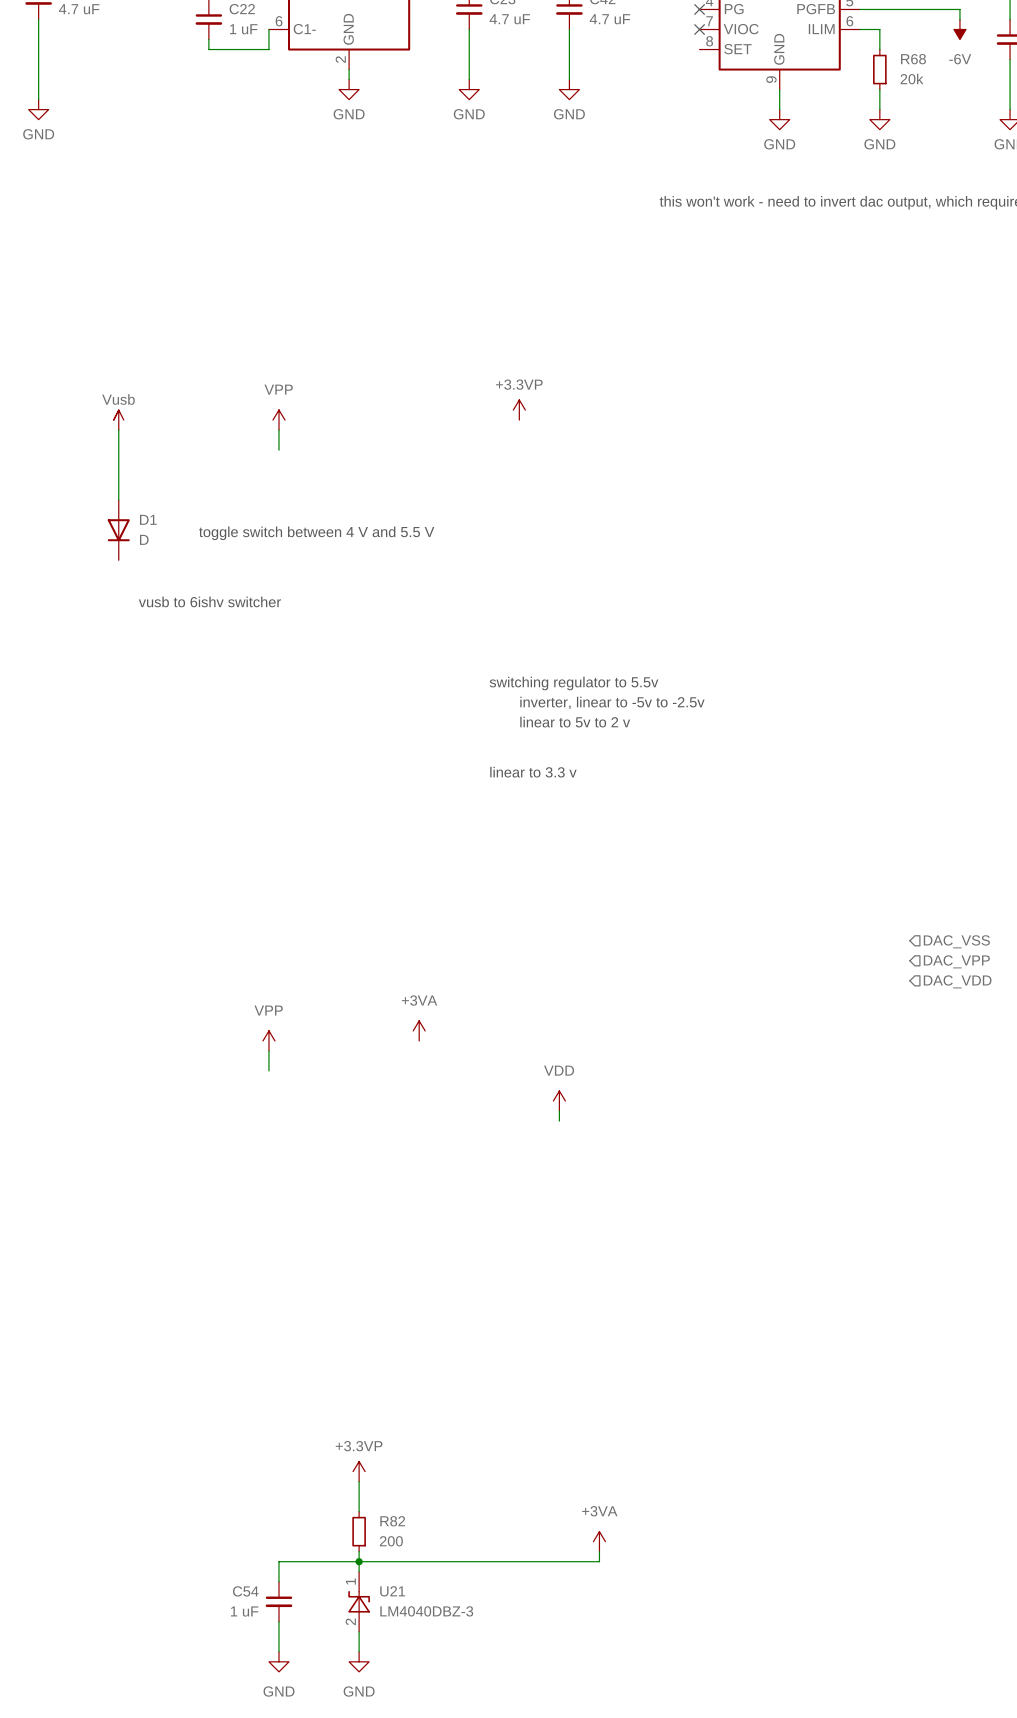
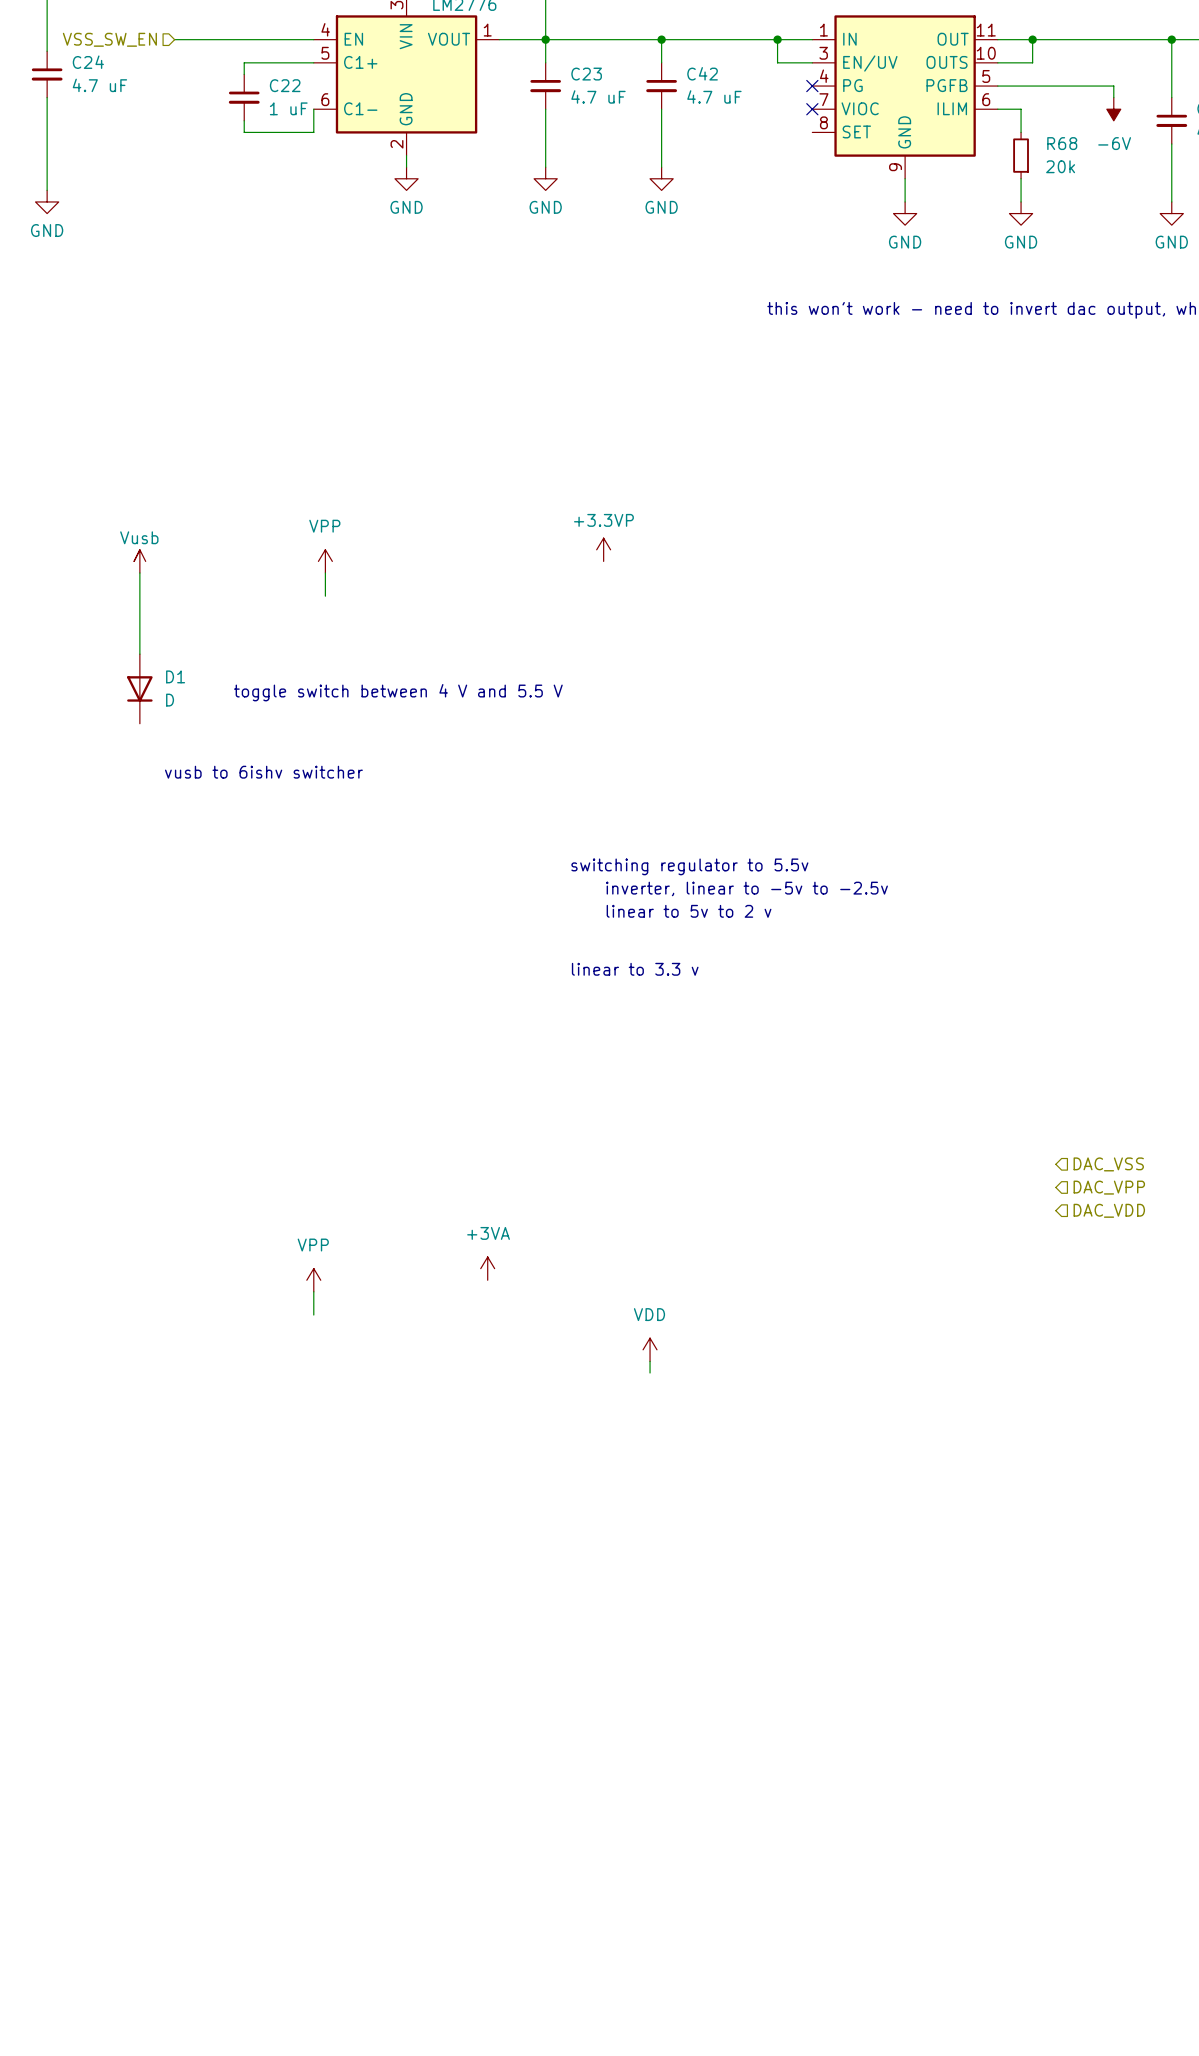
power symbol: +3.3VP (359, 1471) -> none
wire: (359, 1481) (359, 1511) -> none
R82: 200 (359, 1531) -> none
power symbol: +3VA (599, 1541) -> none
wire: (359, 1551) (359, 1571) -> none
wire: (599, 1551) (599, 1561) (278, 1561) (278, 1581) -> none
junction: (359, 1561) -> none
C54: 1 uF (278, 1601) -> none
U21: LM4040DBZ-3 (359, 1601) -> none
wire: (278, 1621) (278, 1651) -> none
wire: (359, 1631) (359, 1651) -> none
power symbol: GND (278, 1661) -> none
power symbol: GND (359, 1661) -> none

